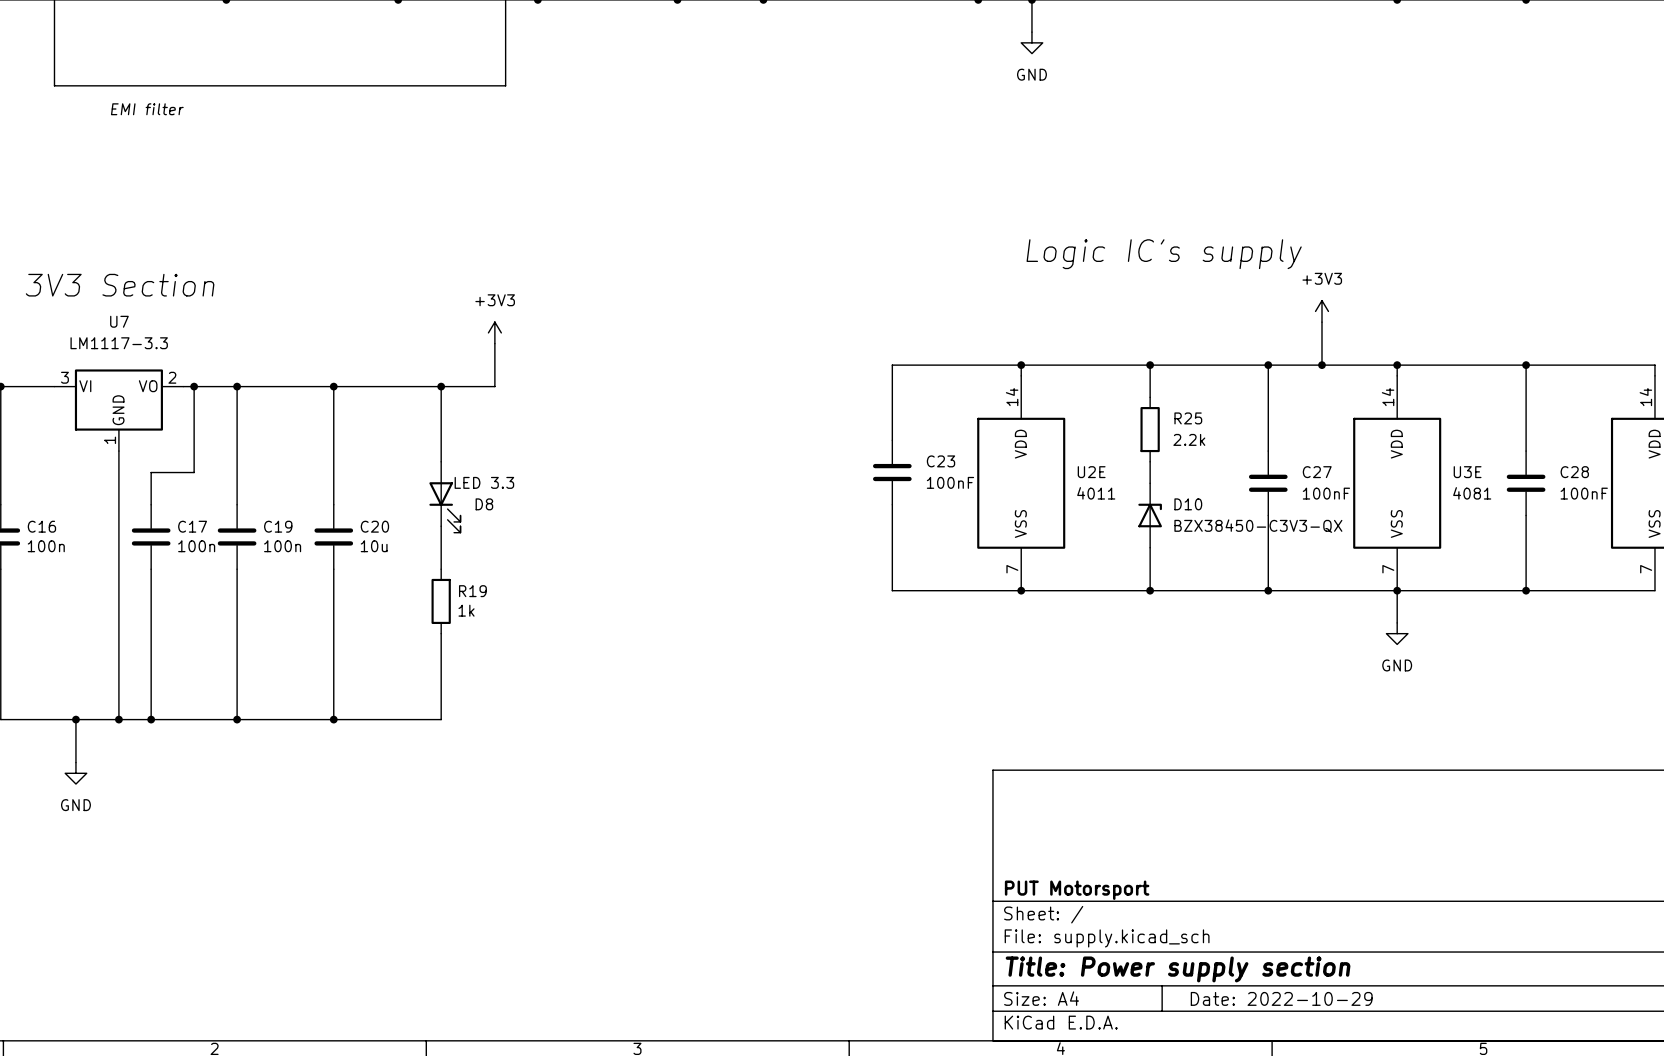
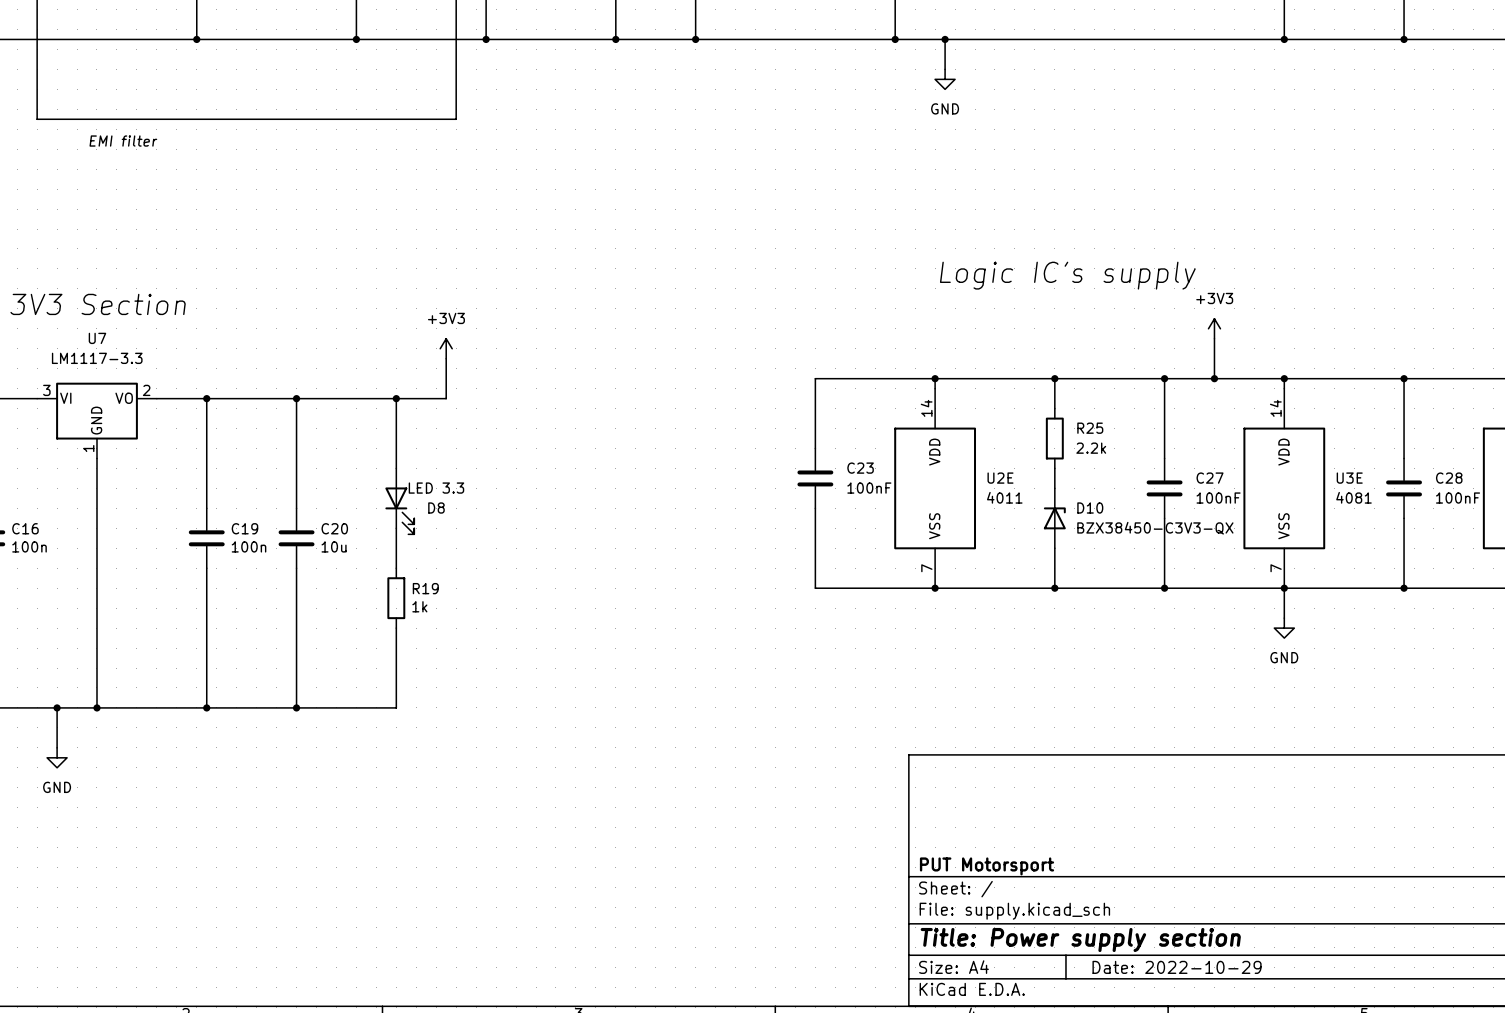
wire: (194, 386) (194, 472) (151, 472) (151, 504) -> none
junction: (194, 386) -> none
C17: 100n (151, 536) -> none
wire: (151, 569) (151, 719) -> none
junction: (151, 719) -> none

